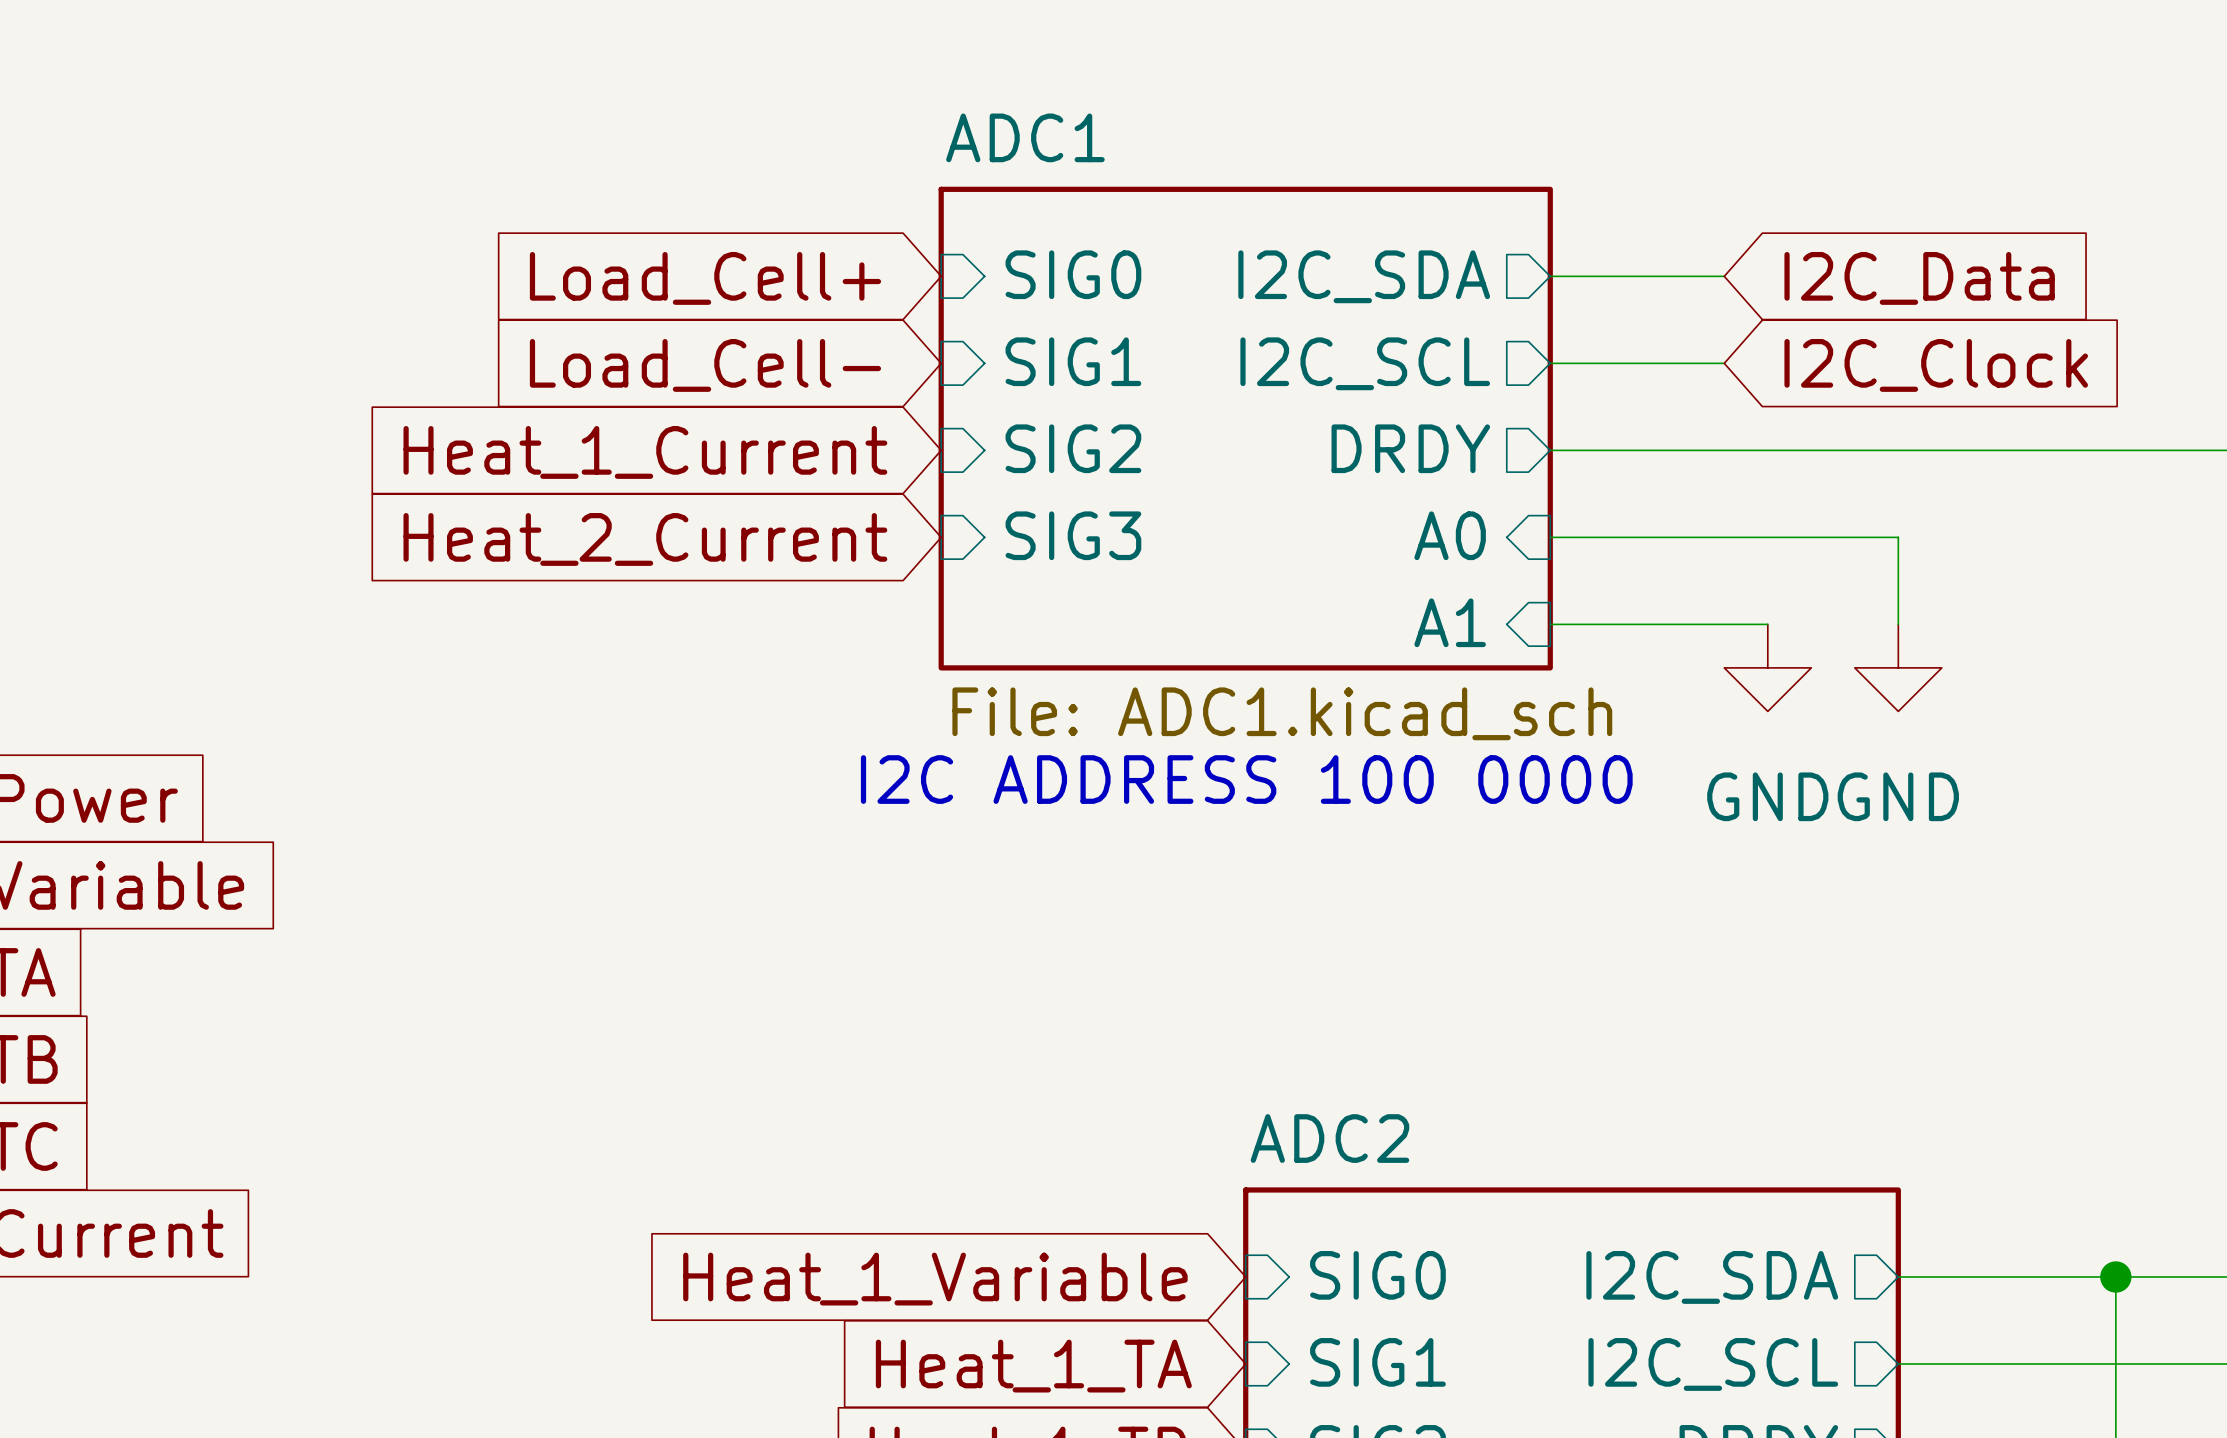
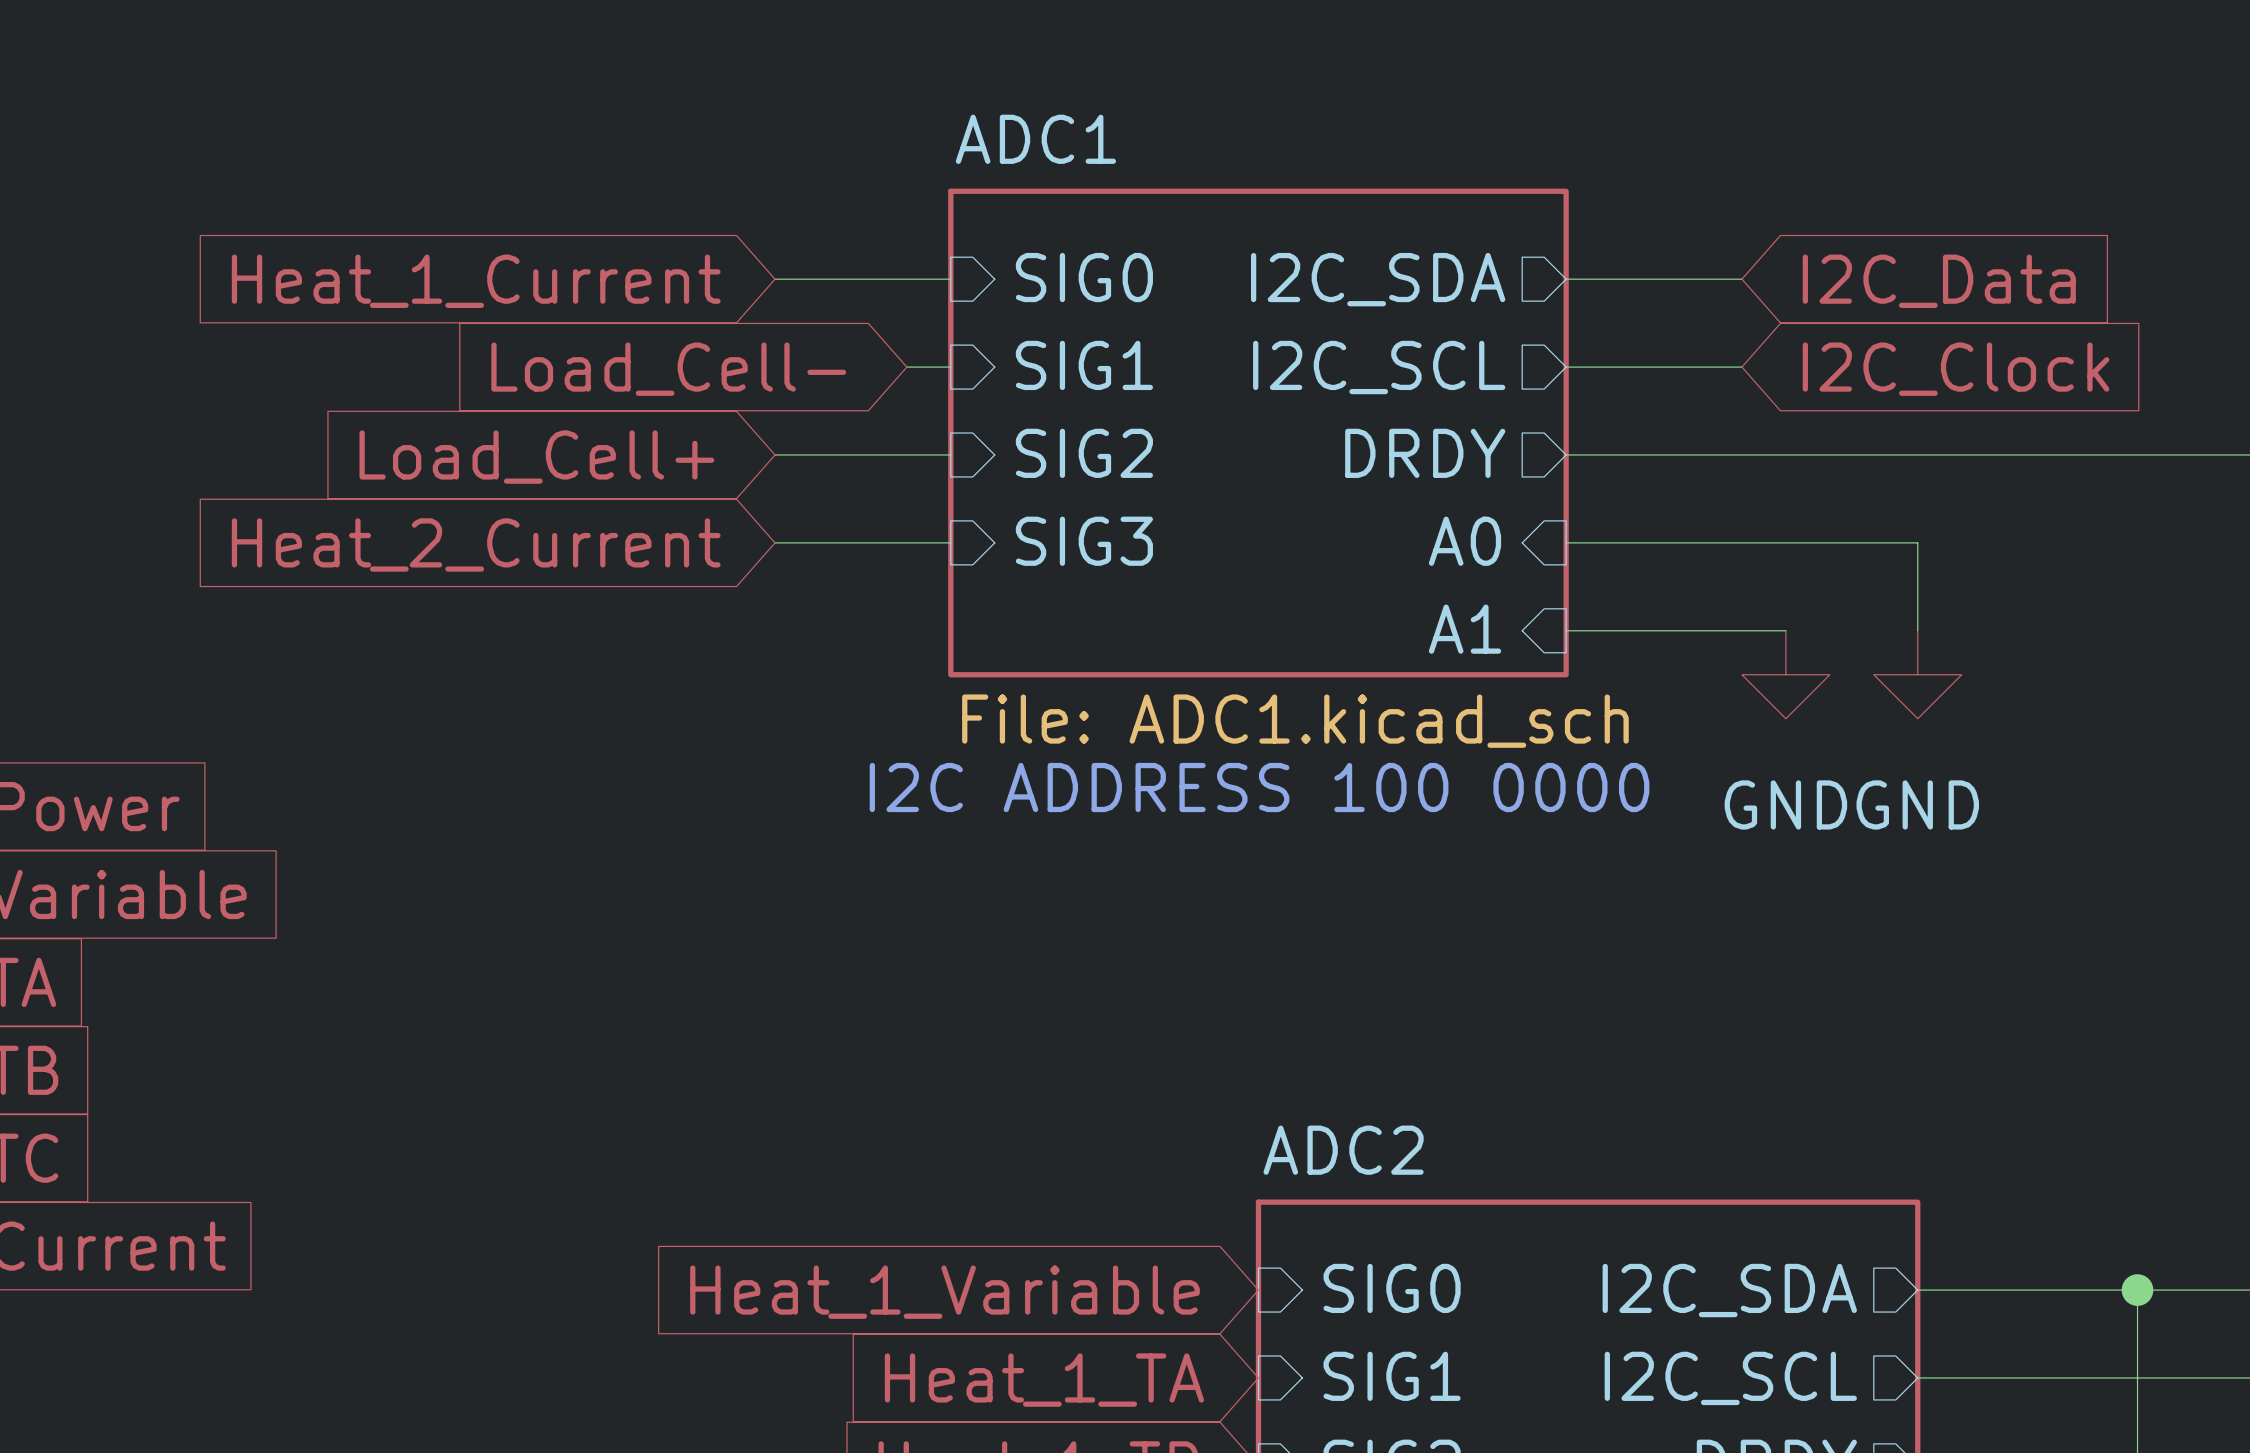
wire: none -> (775, 279) (950, 279)
global label position: Load_Cell+ (705, 278) -> Load_Cell+ (536, 457)
wire: none -> (906, 367) (950, 367)
global label position: Load_Cell- (705, 365) -> Load_Cell- (668, 369)
wire: none -> (775, 454) (950, 454)
global label position: Heat_1_Current (645, 452) -> Heat_1_Current (476, 281)
wire: none -> (775, 542) (950, 542)
global label position: Heat_2_Current (645, 539) -> Heat_2_Current (476, 544)

